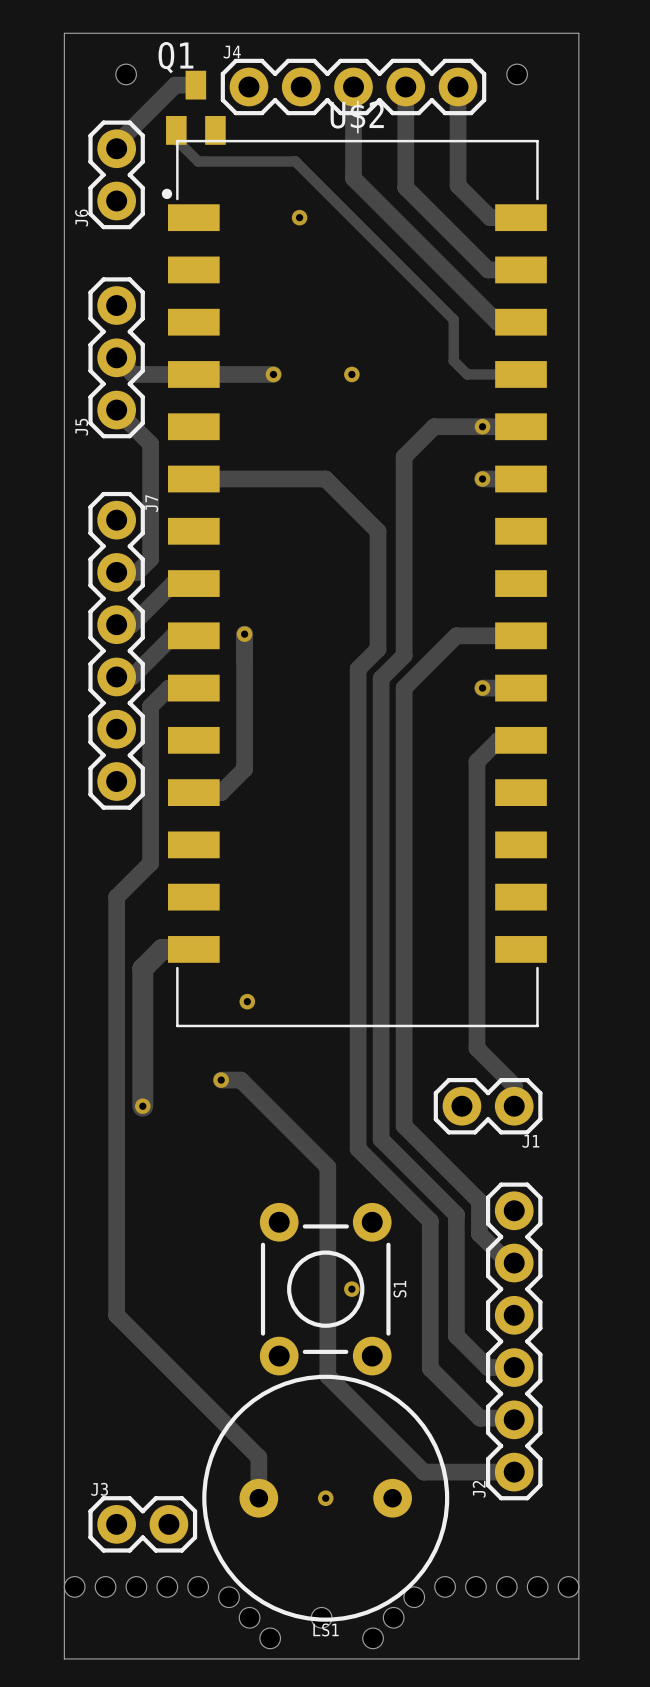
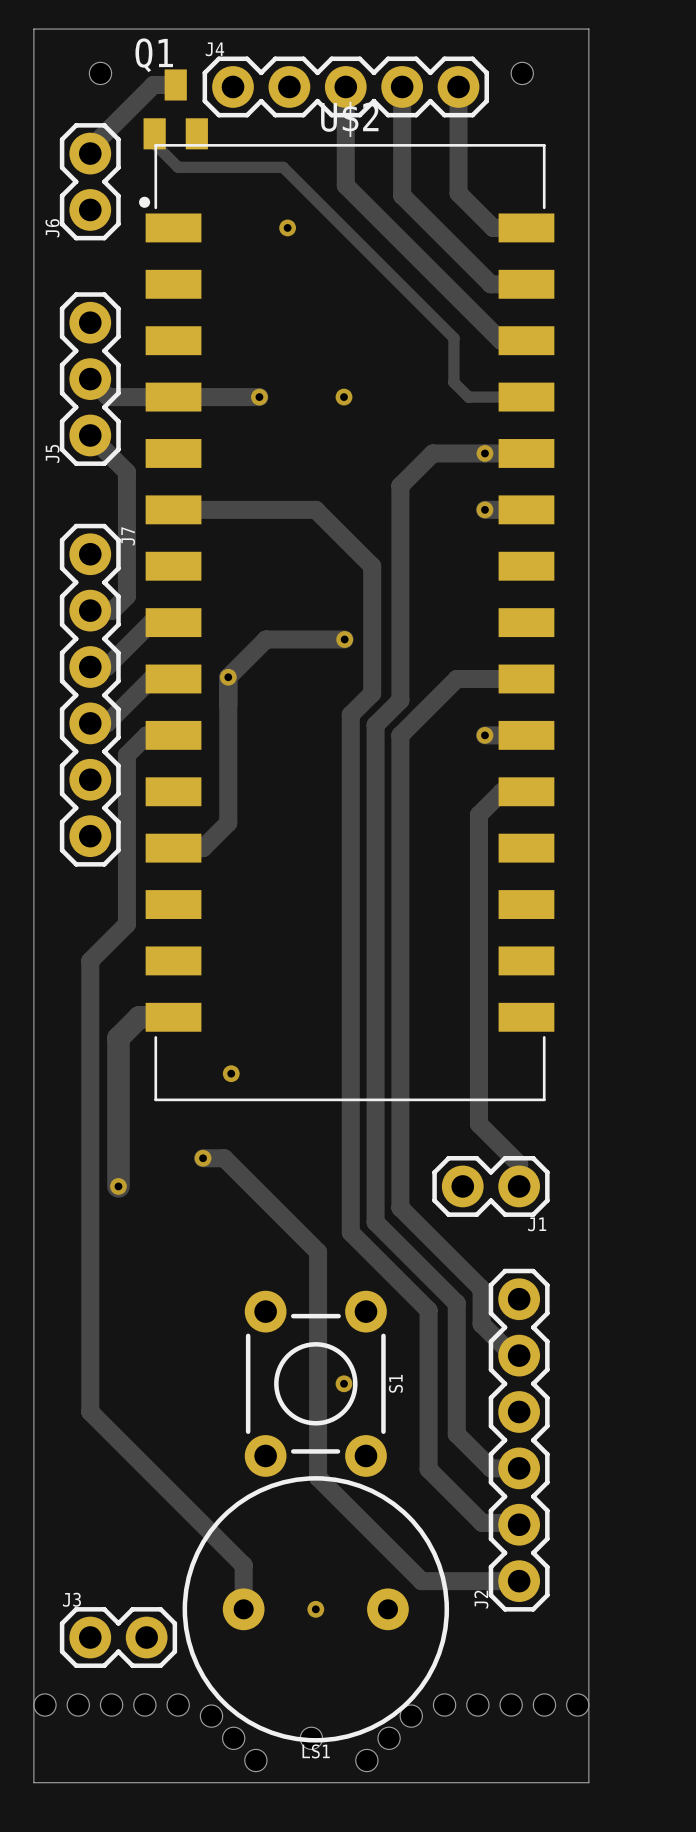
track: none -> (344, 639) (266, 639) (228, 677)
via: none -> (344, 639)

